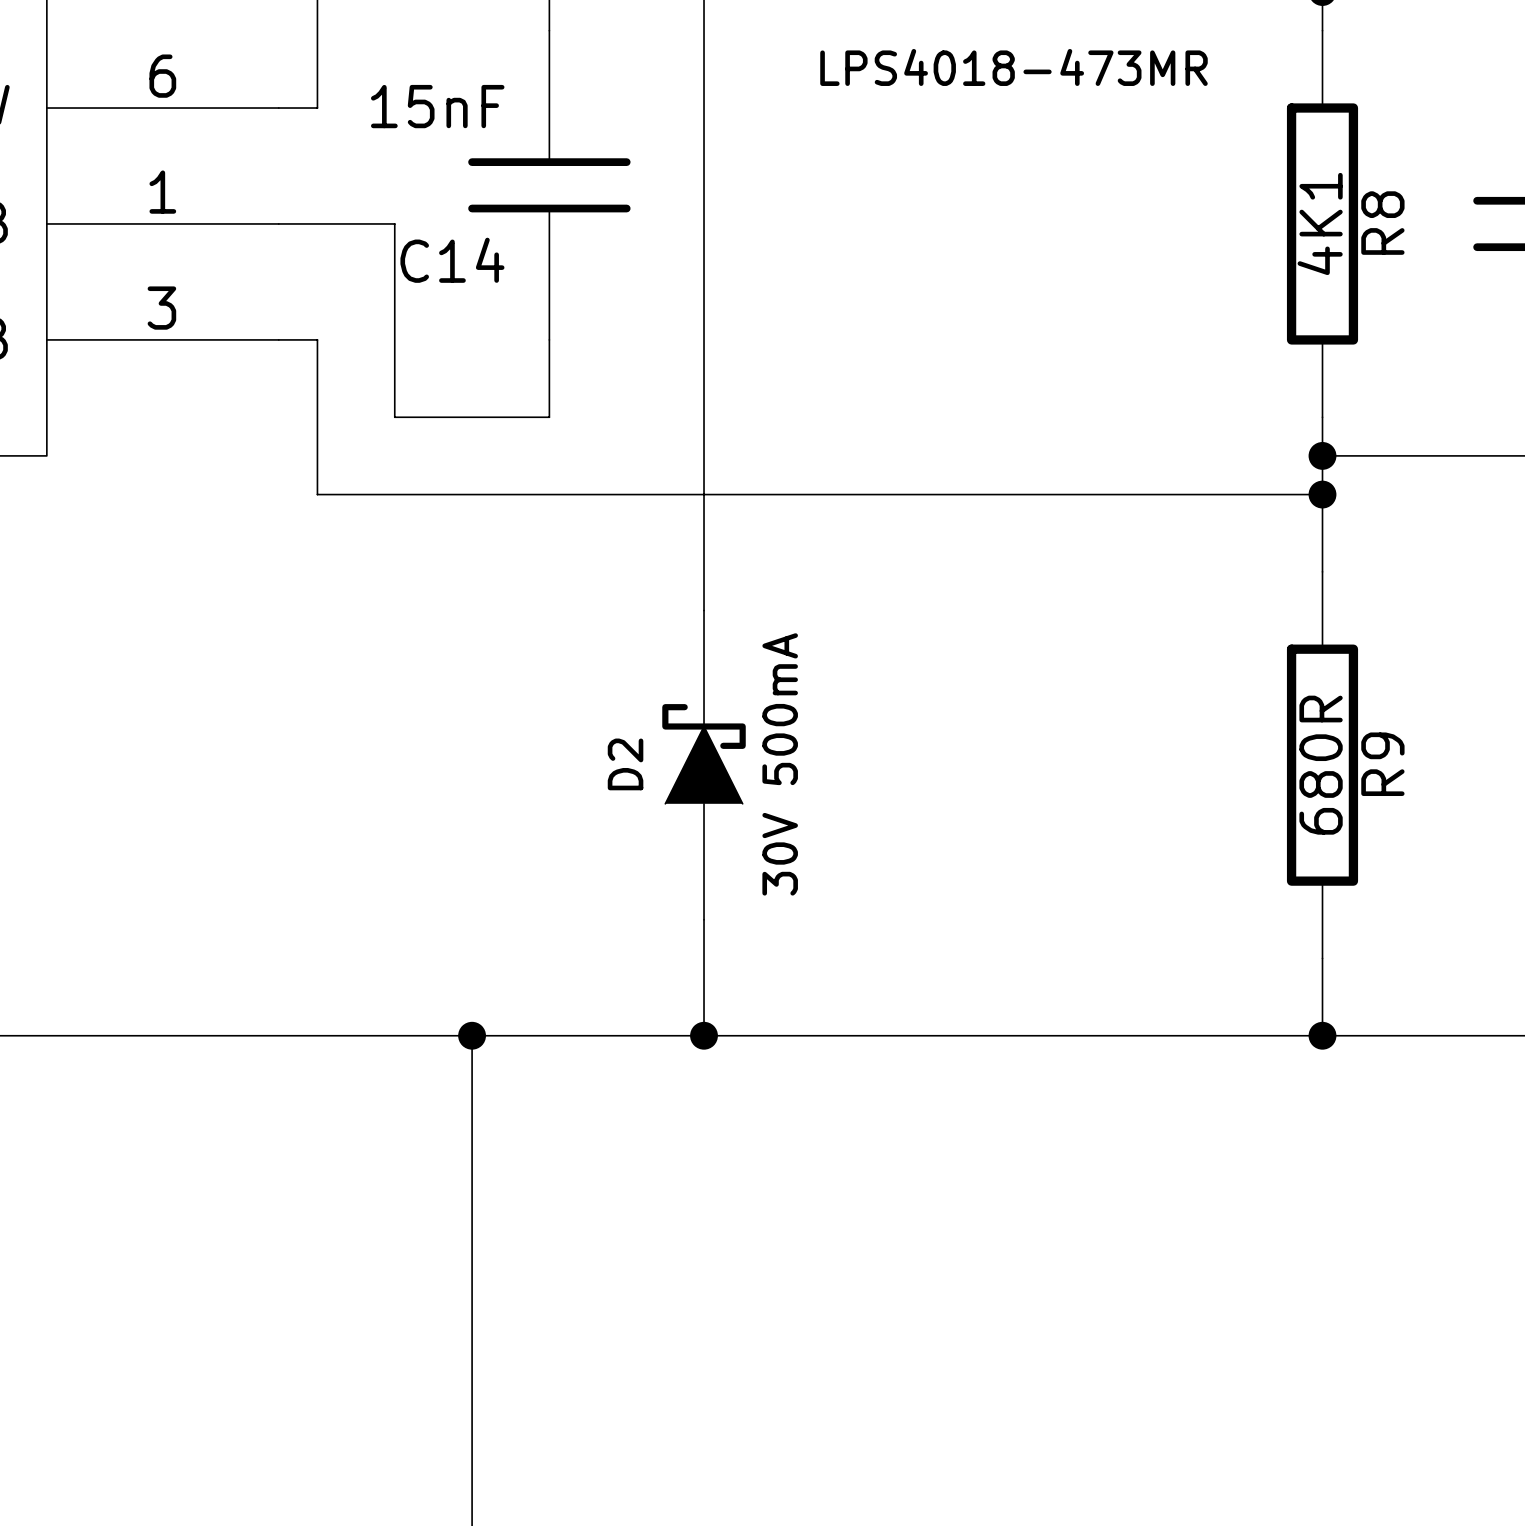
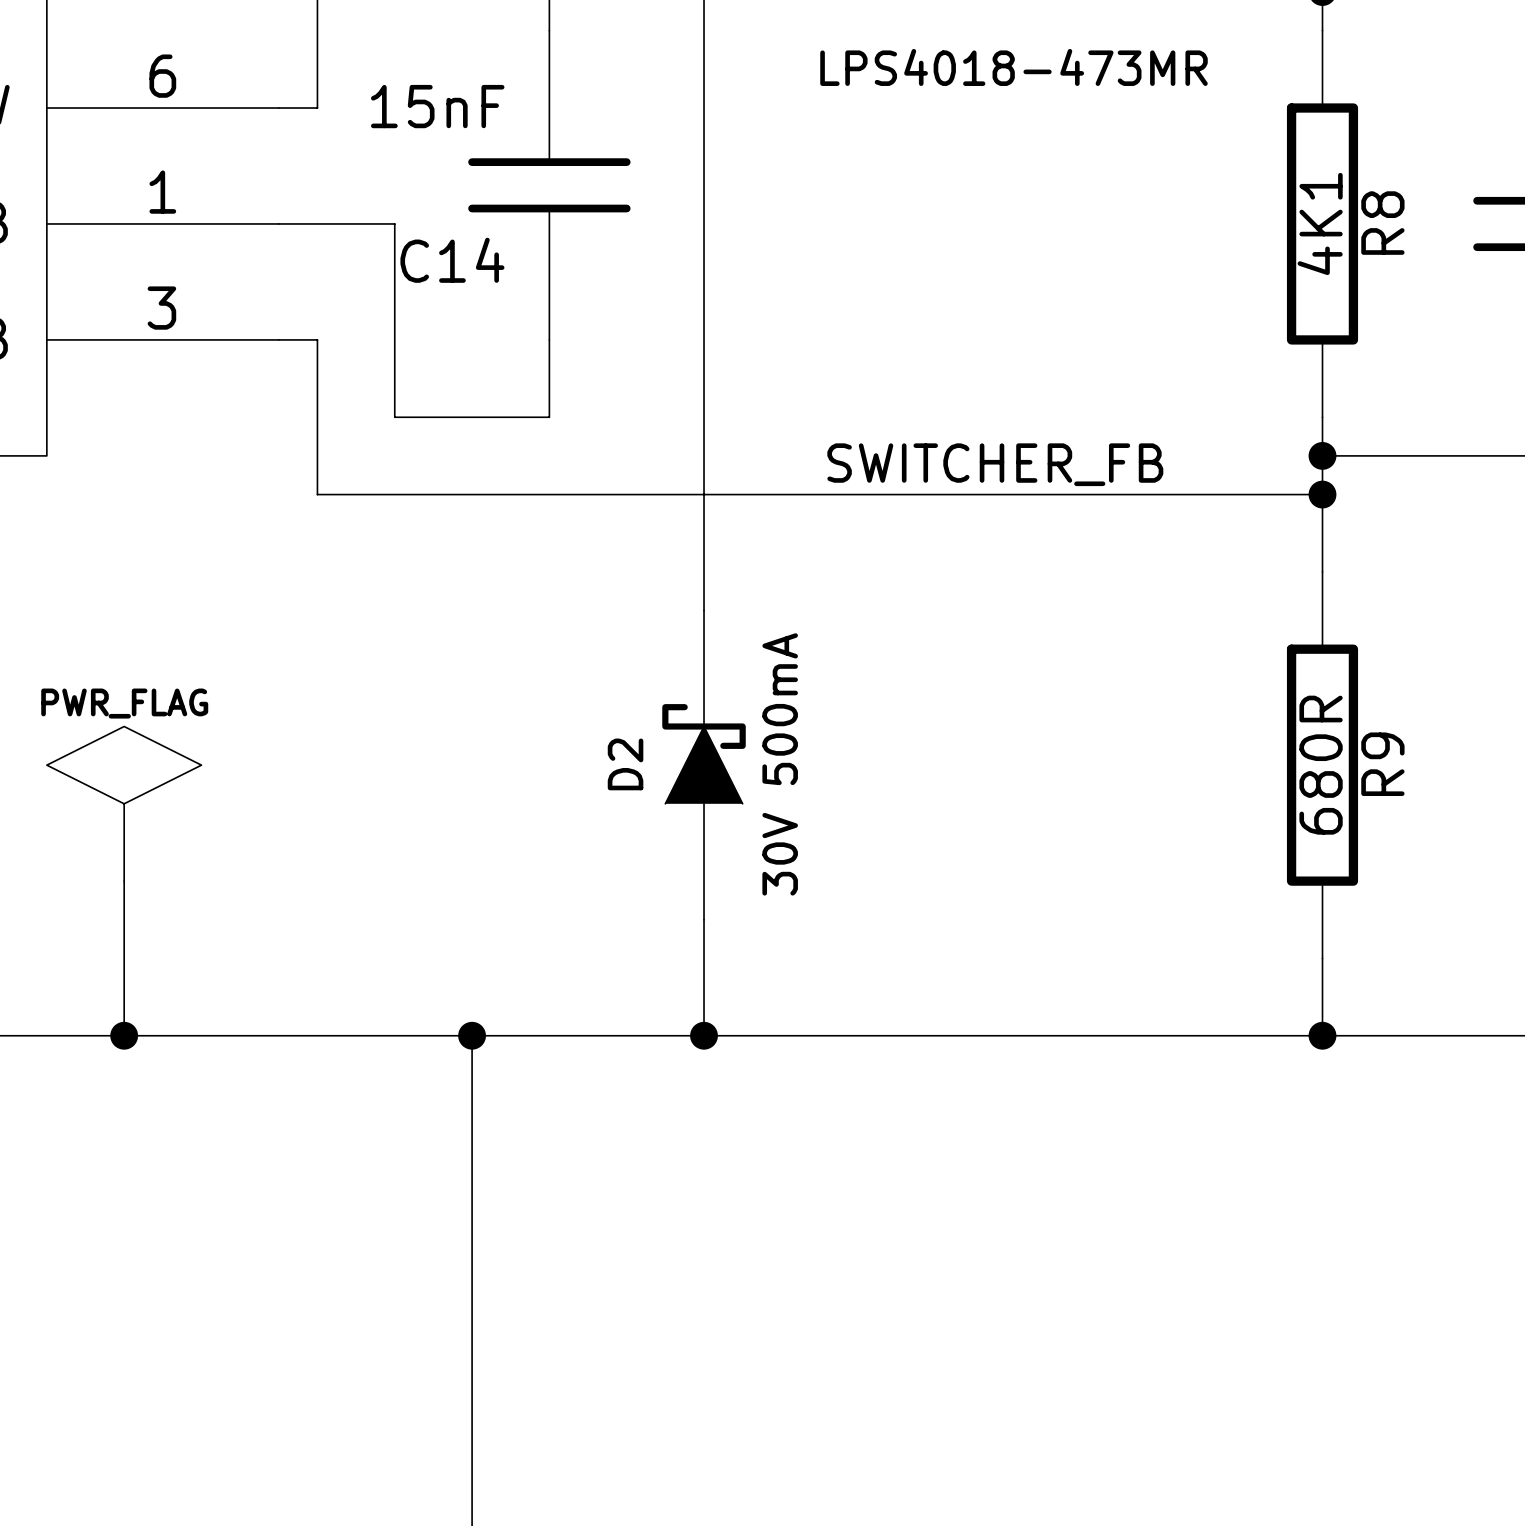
label: none -> SWITCHER_FB (995, 464)
power symbol: none -> PWR_FLAG (124, 803)
wire: none -> (124, 881) (124, 1035)
junction: none -> (124, 1035)

